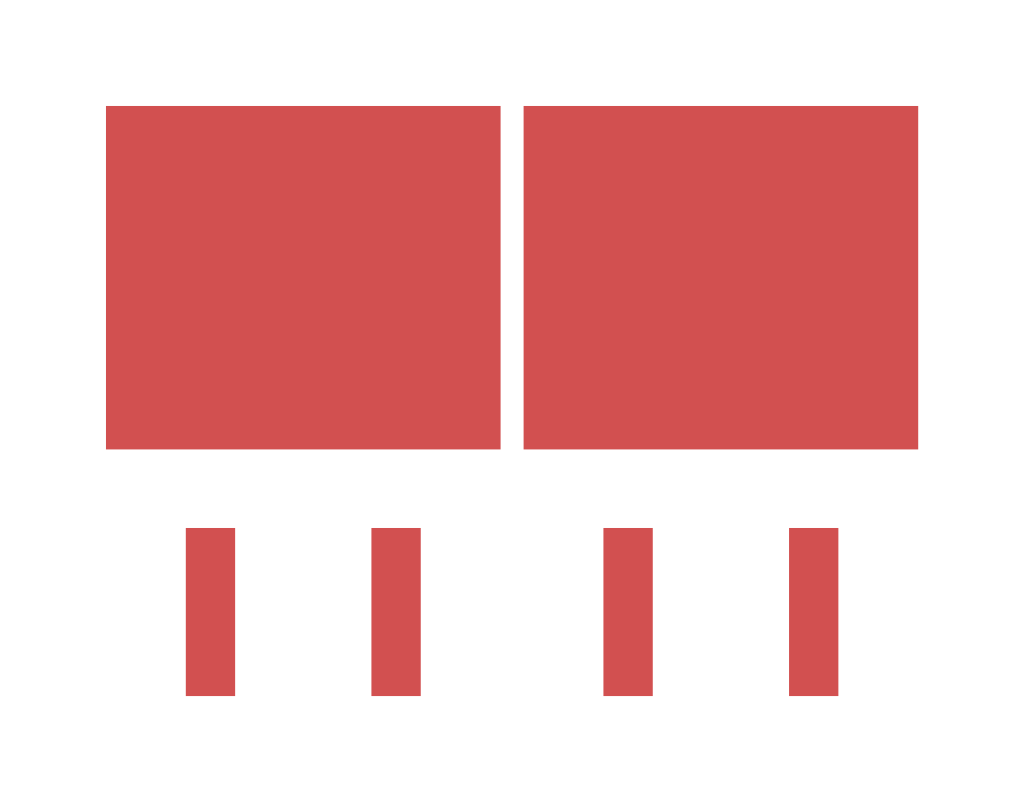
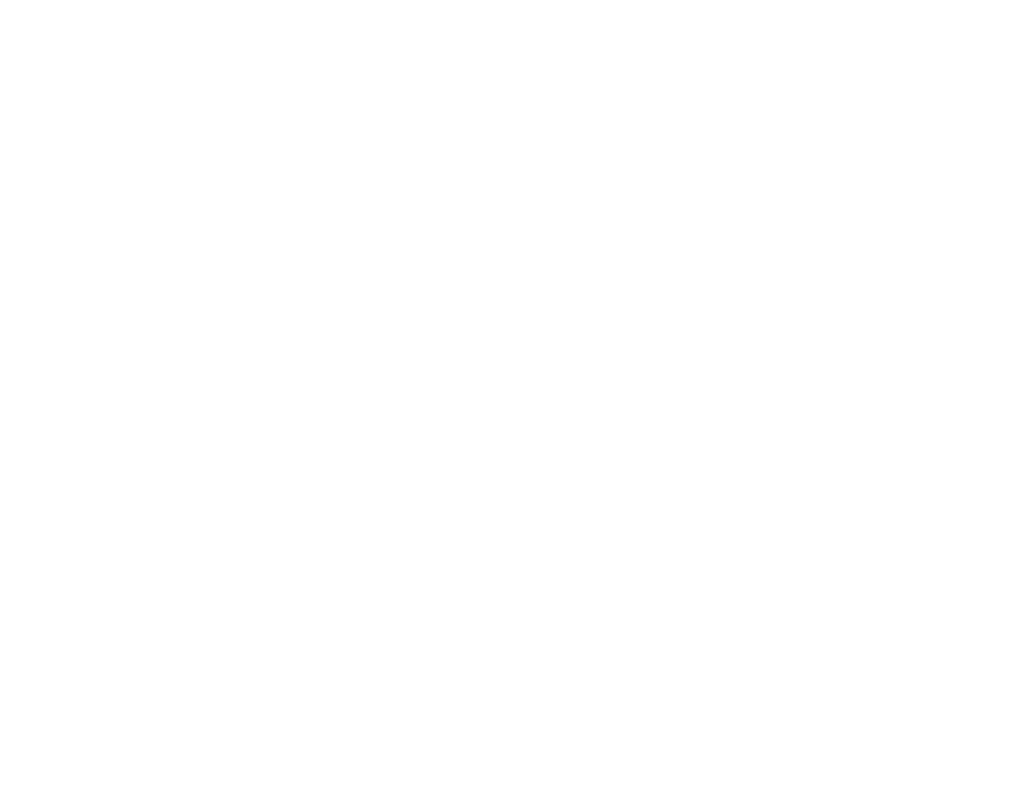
part: (303, 401) -> none
part: (720, 401) -> none

